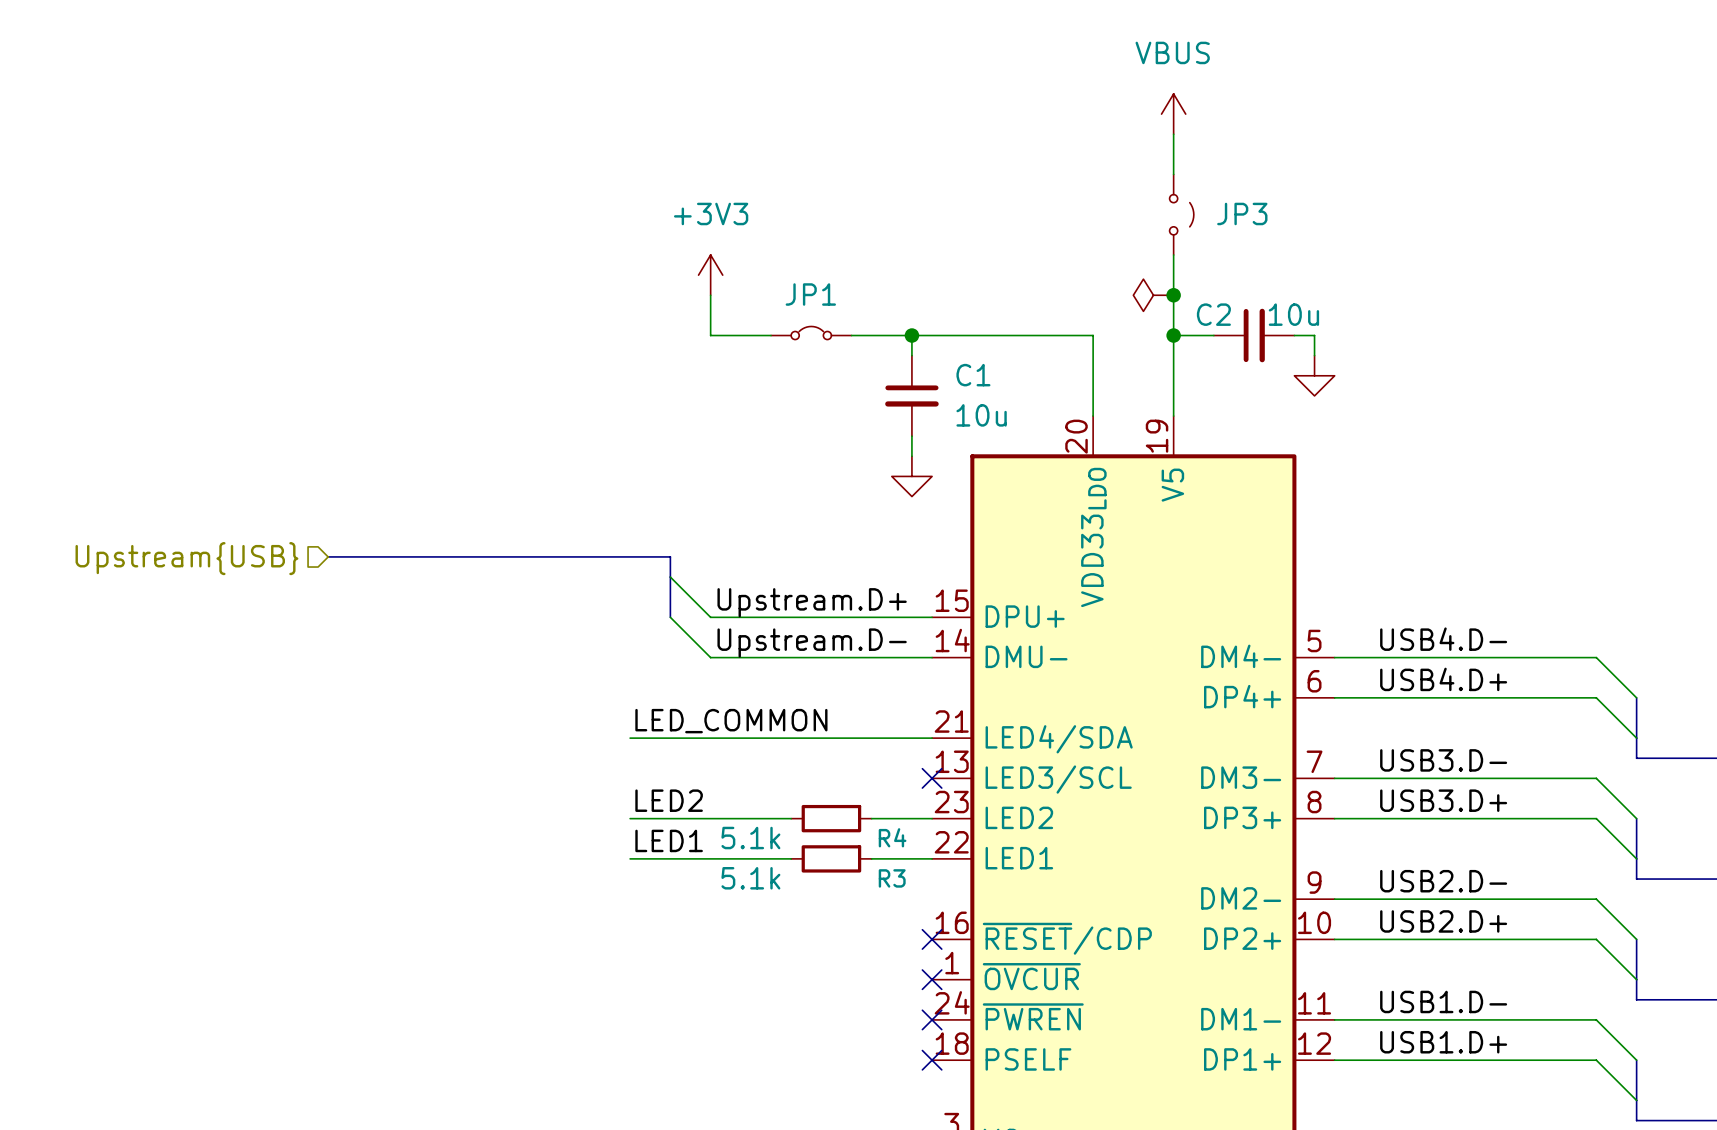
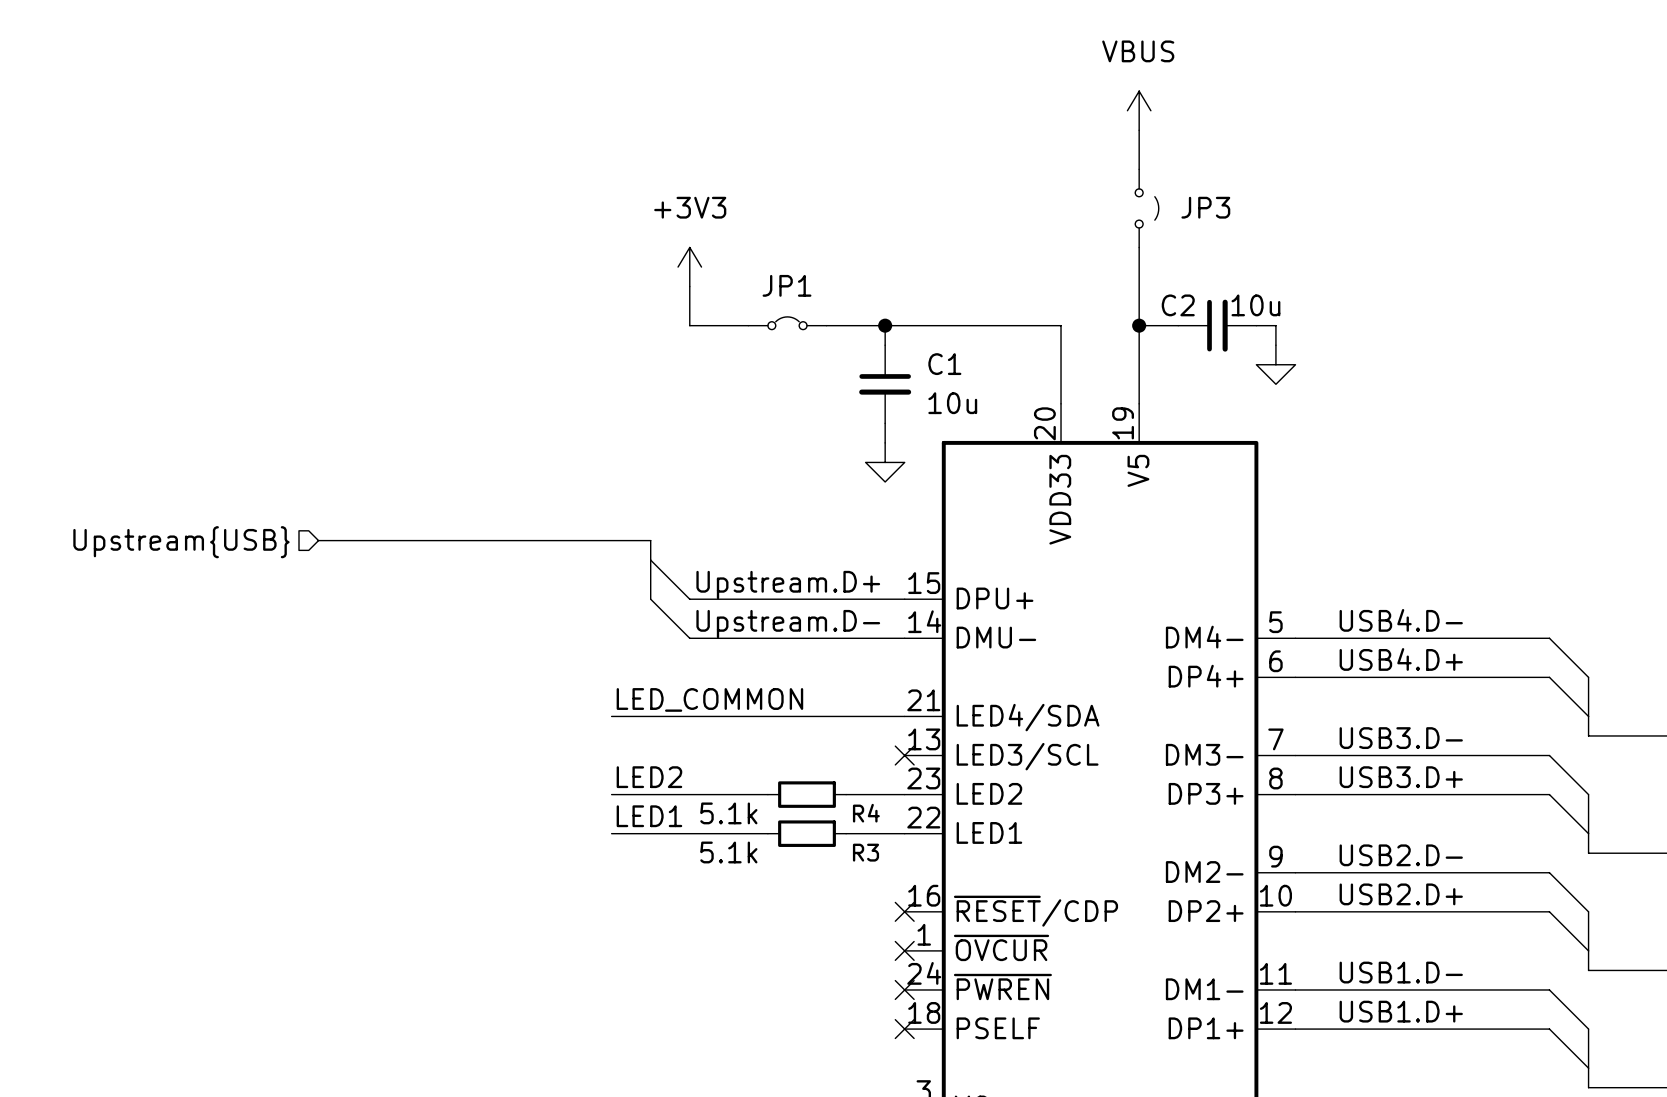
power symbol: (1153, 295) -> none
junction: (1173, 295) -> none
part pin name: VDD33LDO (1093, 537) -> VDD33 (1060, 499)

